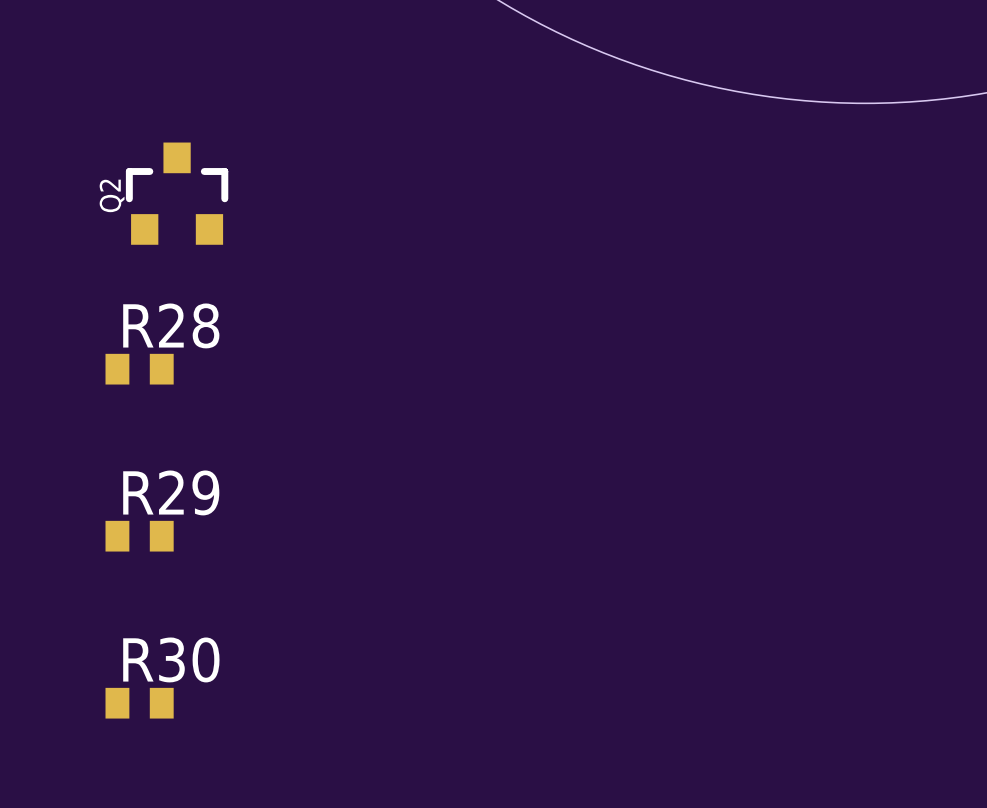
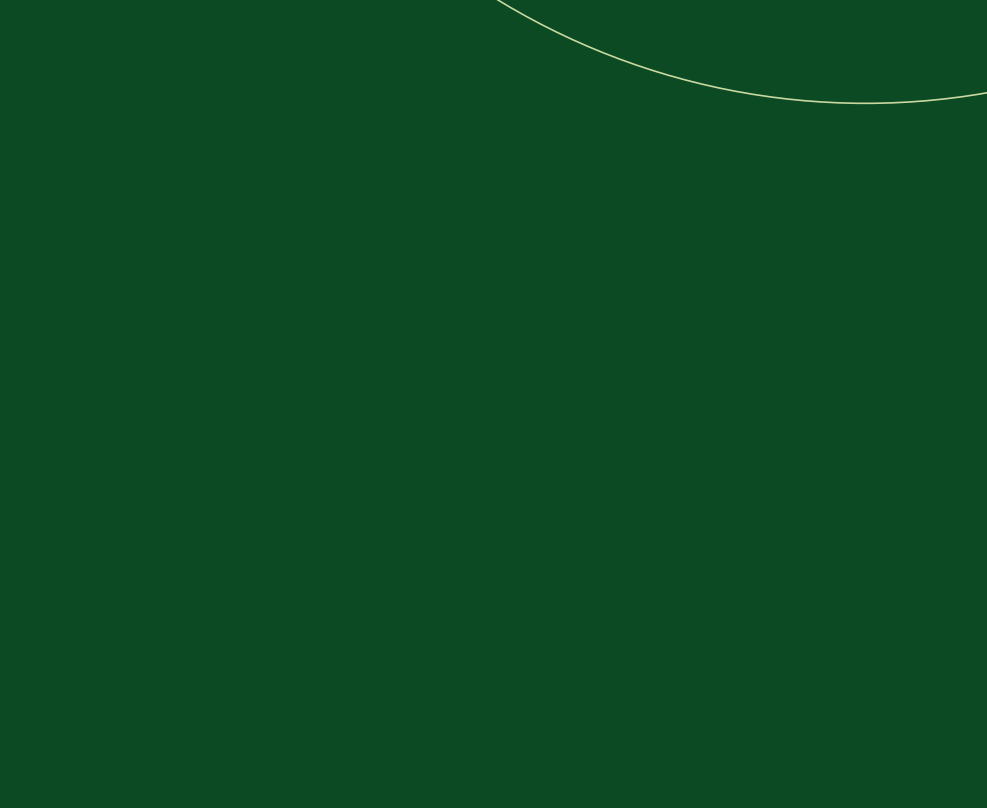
Q2: (177, 193) -> none
R28: (139, 369) -> none
R29: (139, 536) -> none
R30: (139, 703) -> none

